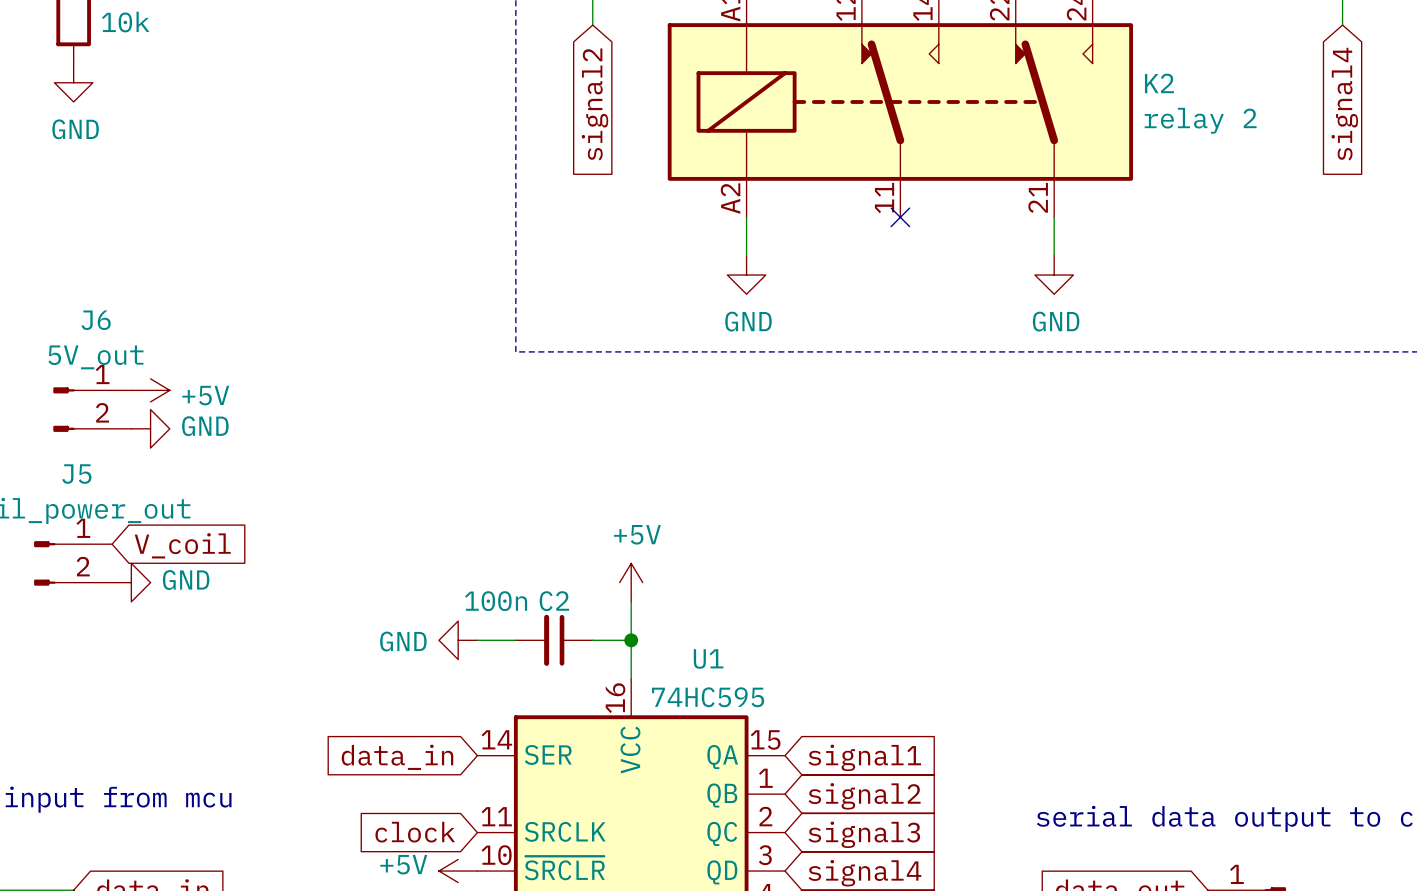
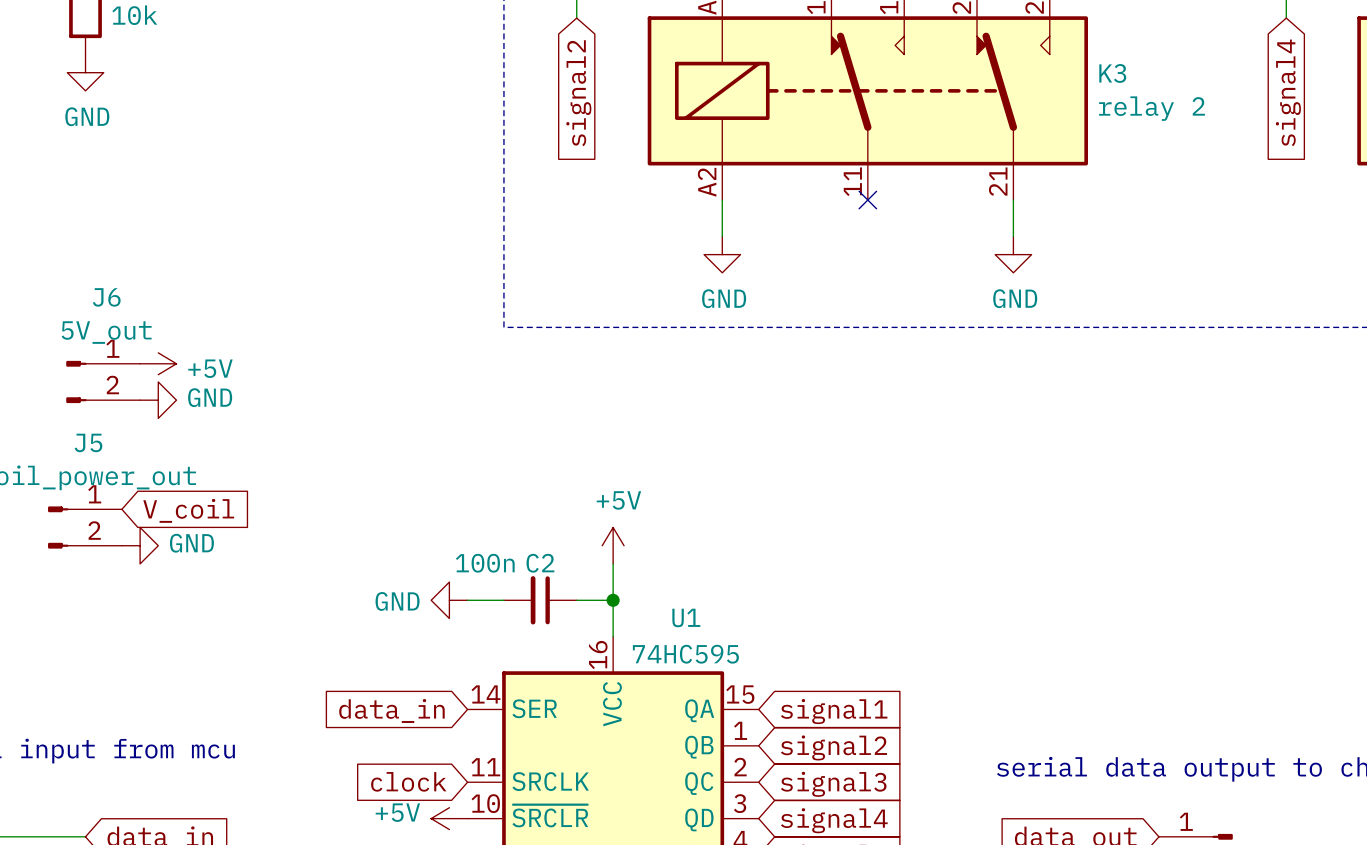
K2 name: K2 (1159, 83) -> K3 (1112, 73)

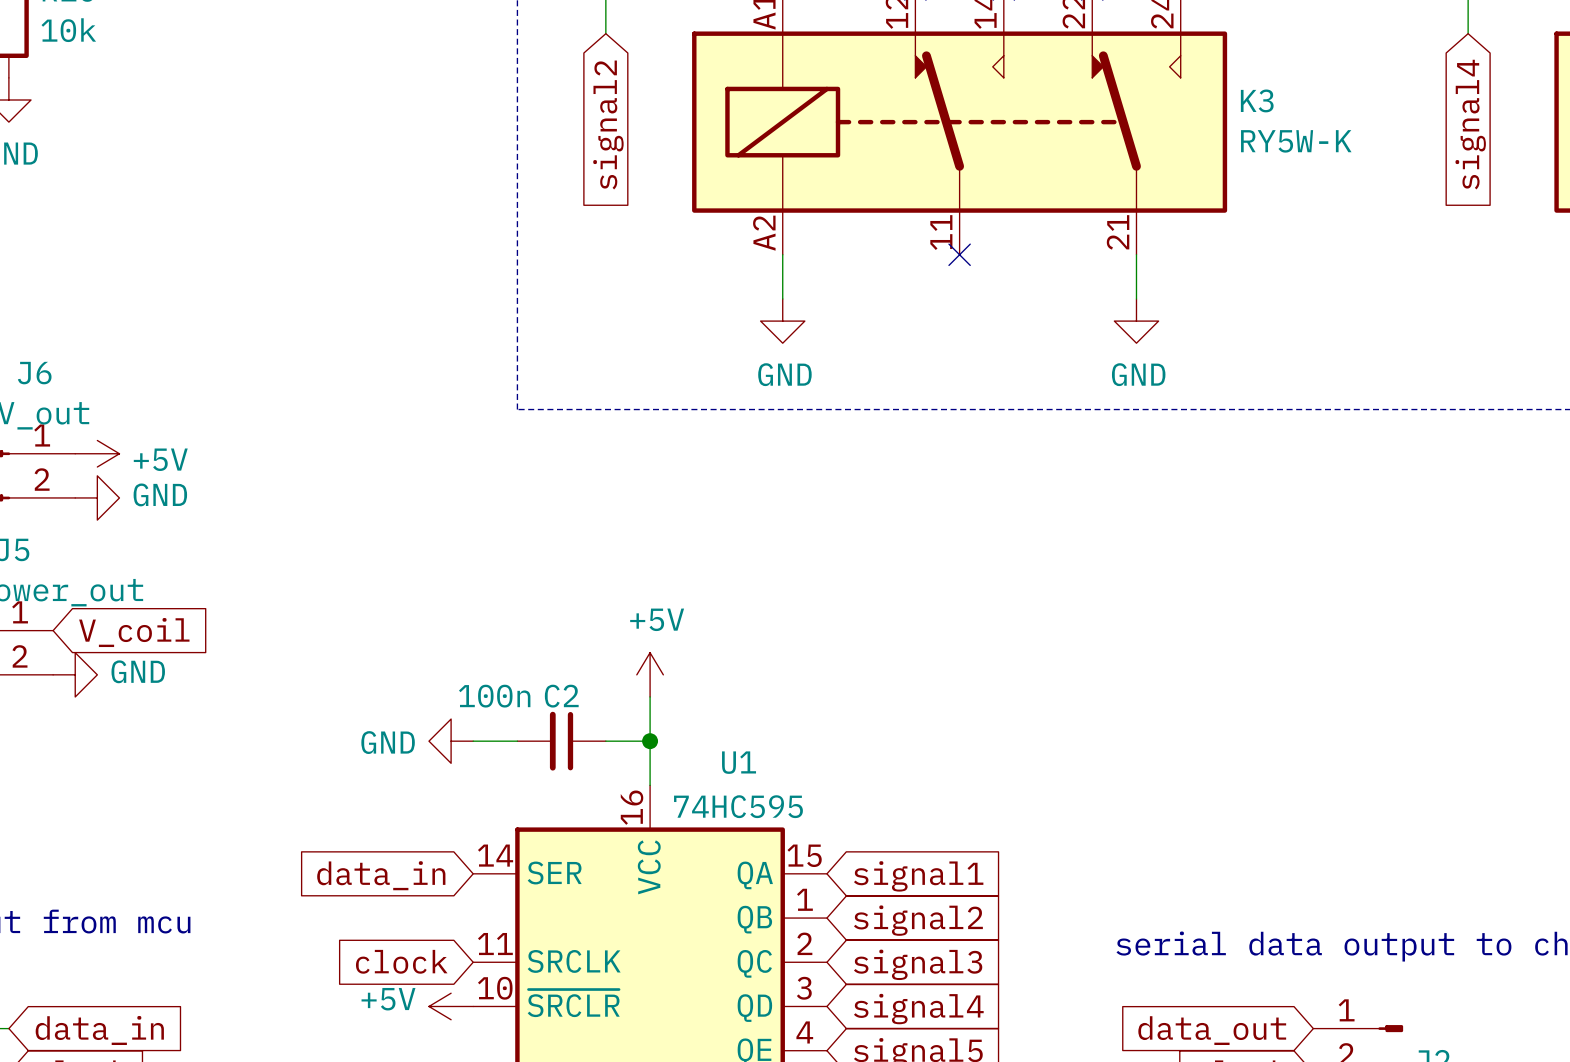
K3 value: relay 2 (1152, 108) -> RY5W-K (1296, 141)

